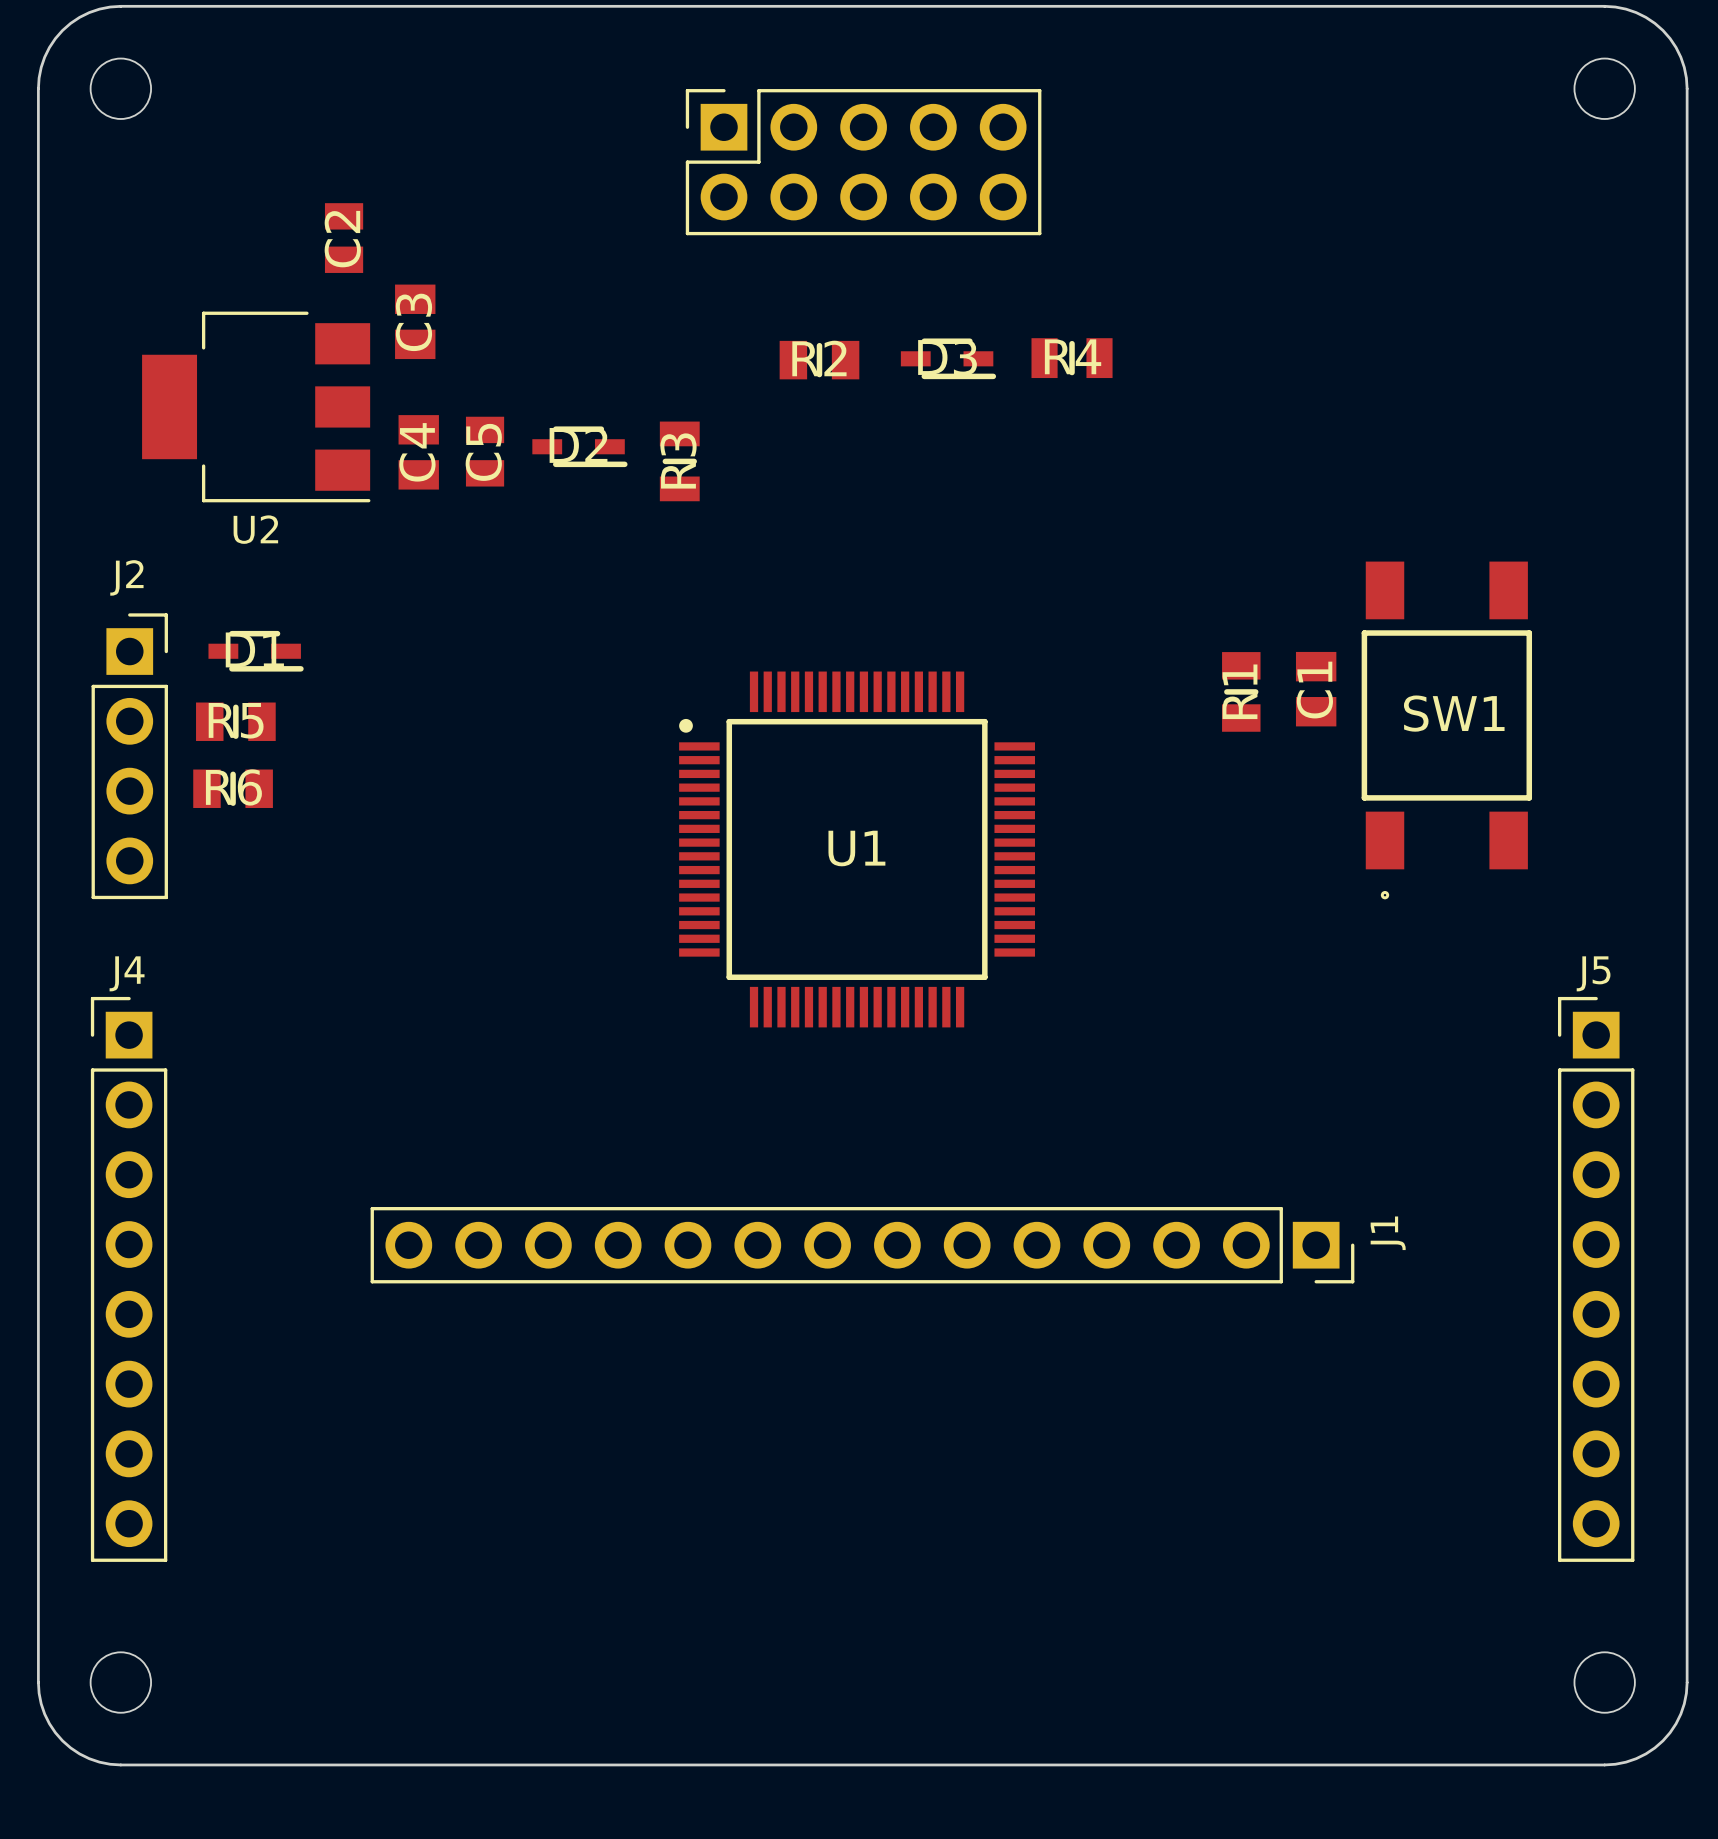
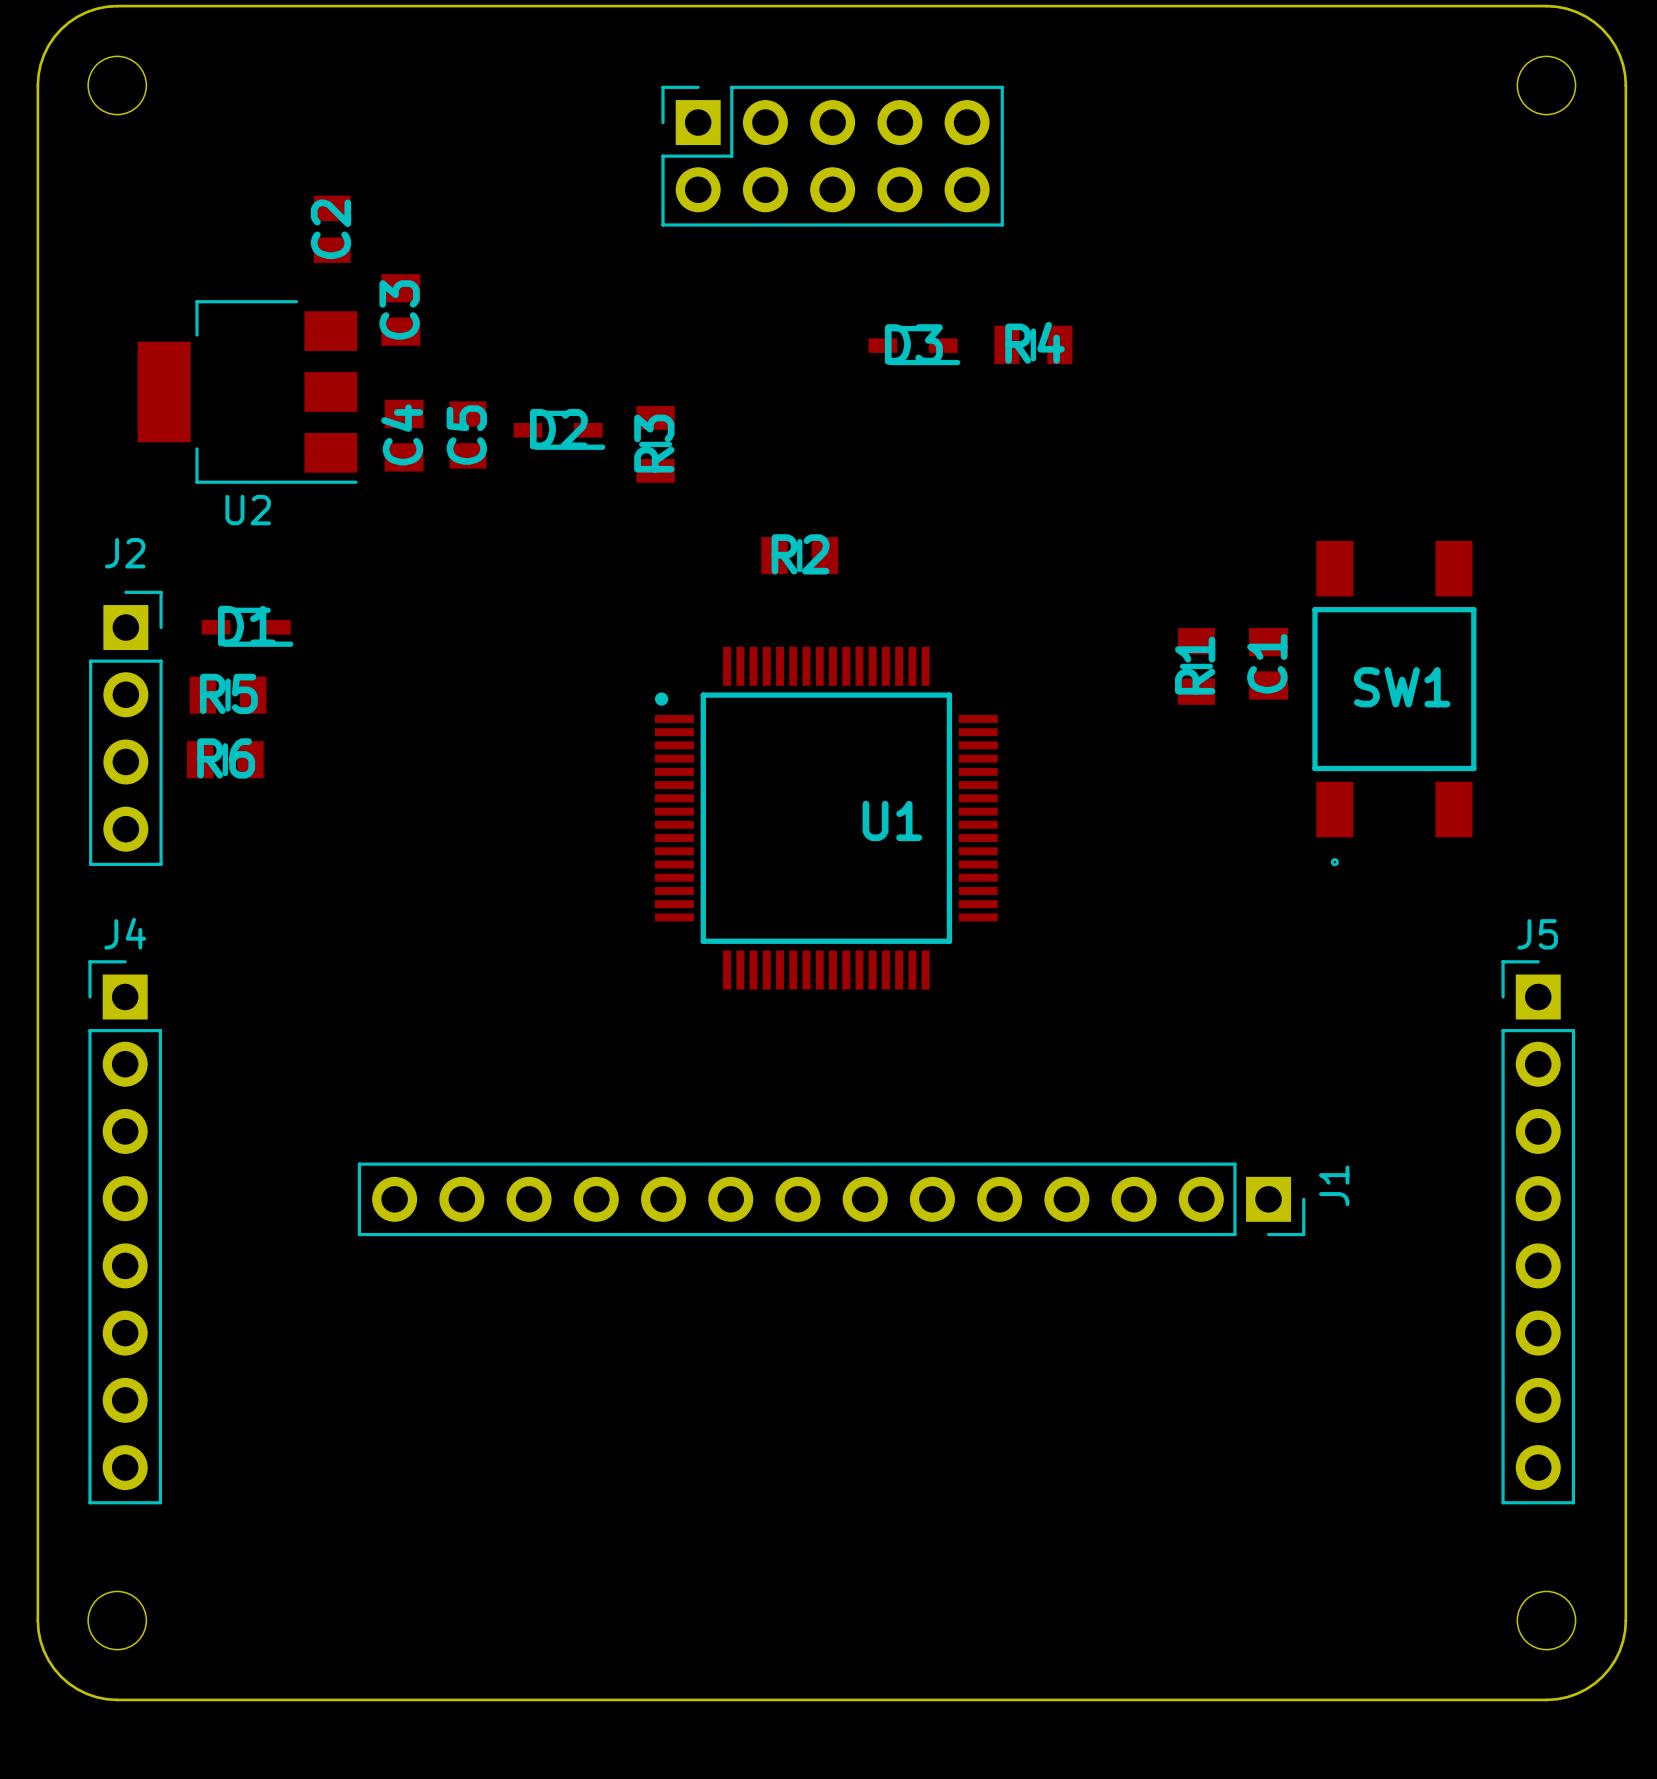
R2 position: (819, 360) -> (799, 555)
U1 name position: U1 (856, 848) -> U1 (892, 820)

